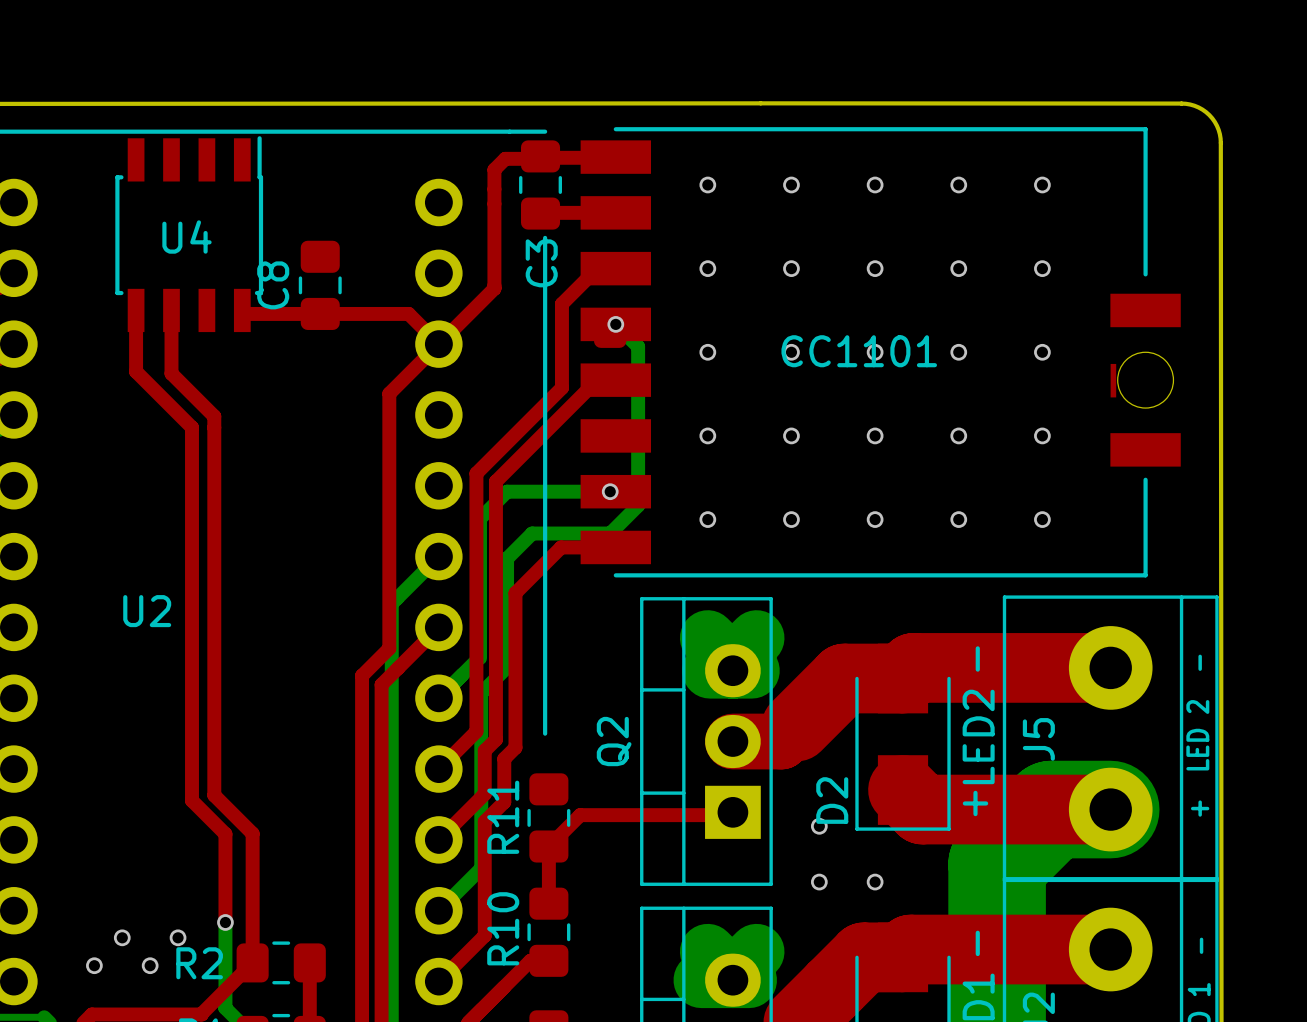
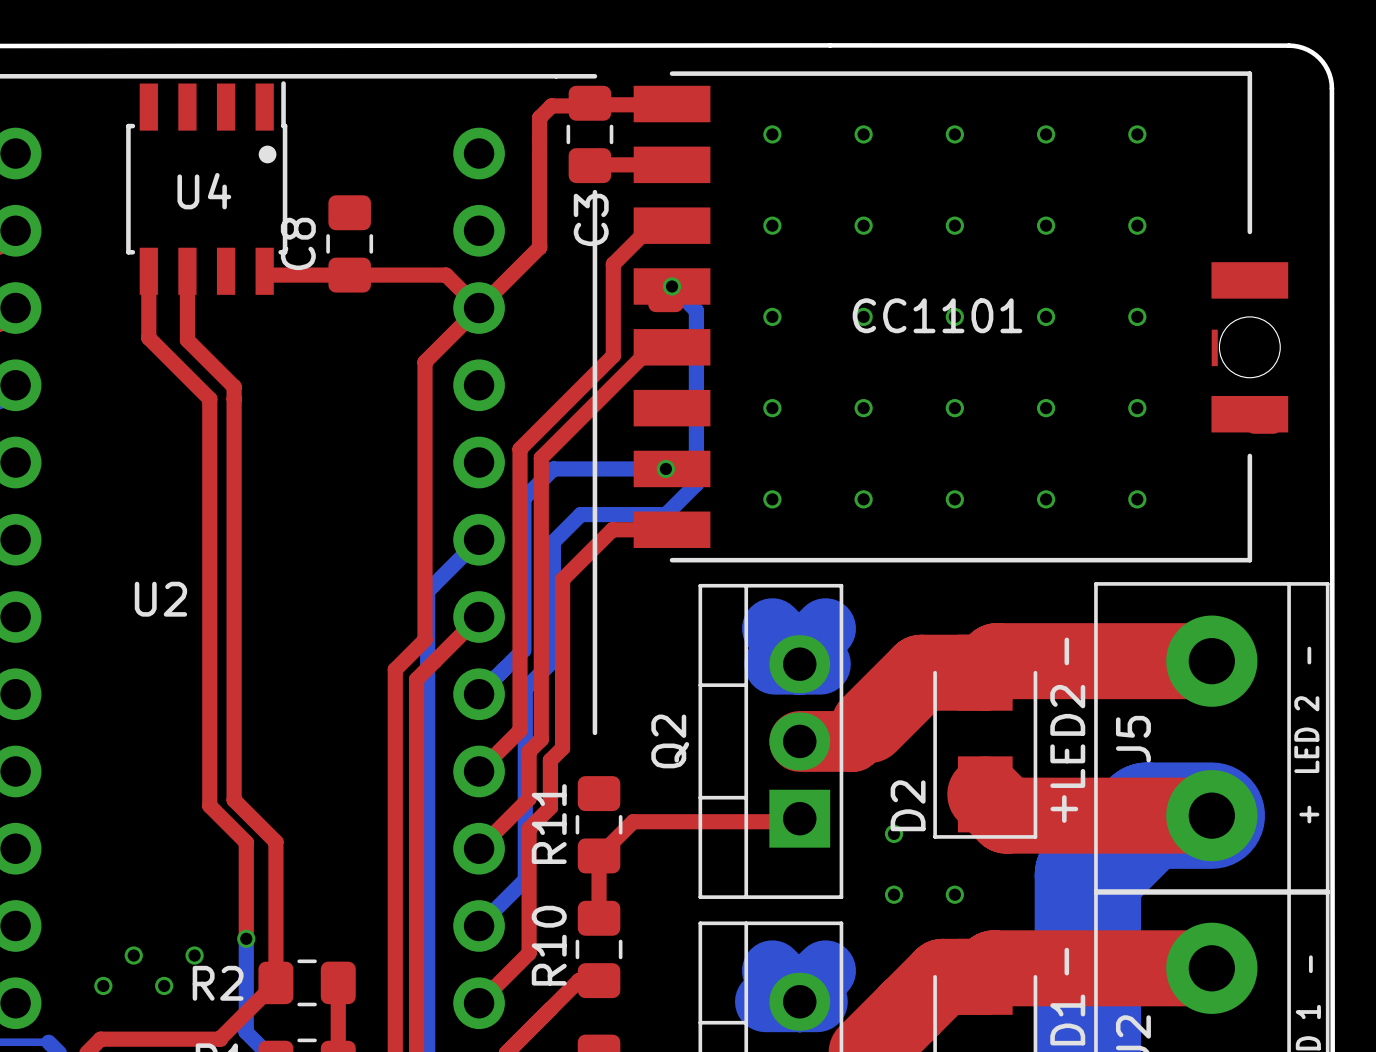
part footprint: [580, 127, 1181, 578] -> [633, 71, 1289, 563]
drawing: none -> [258, 145, 277, 164]

